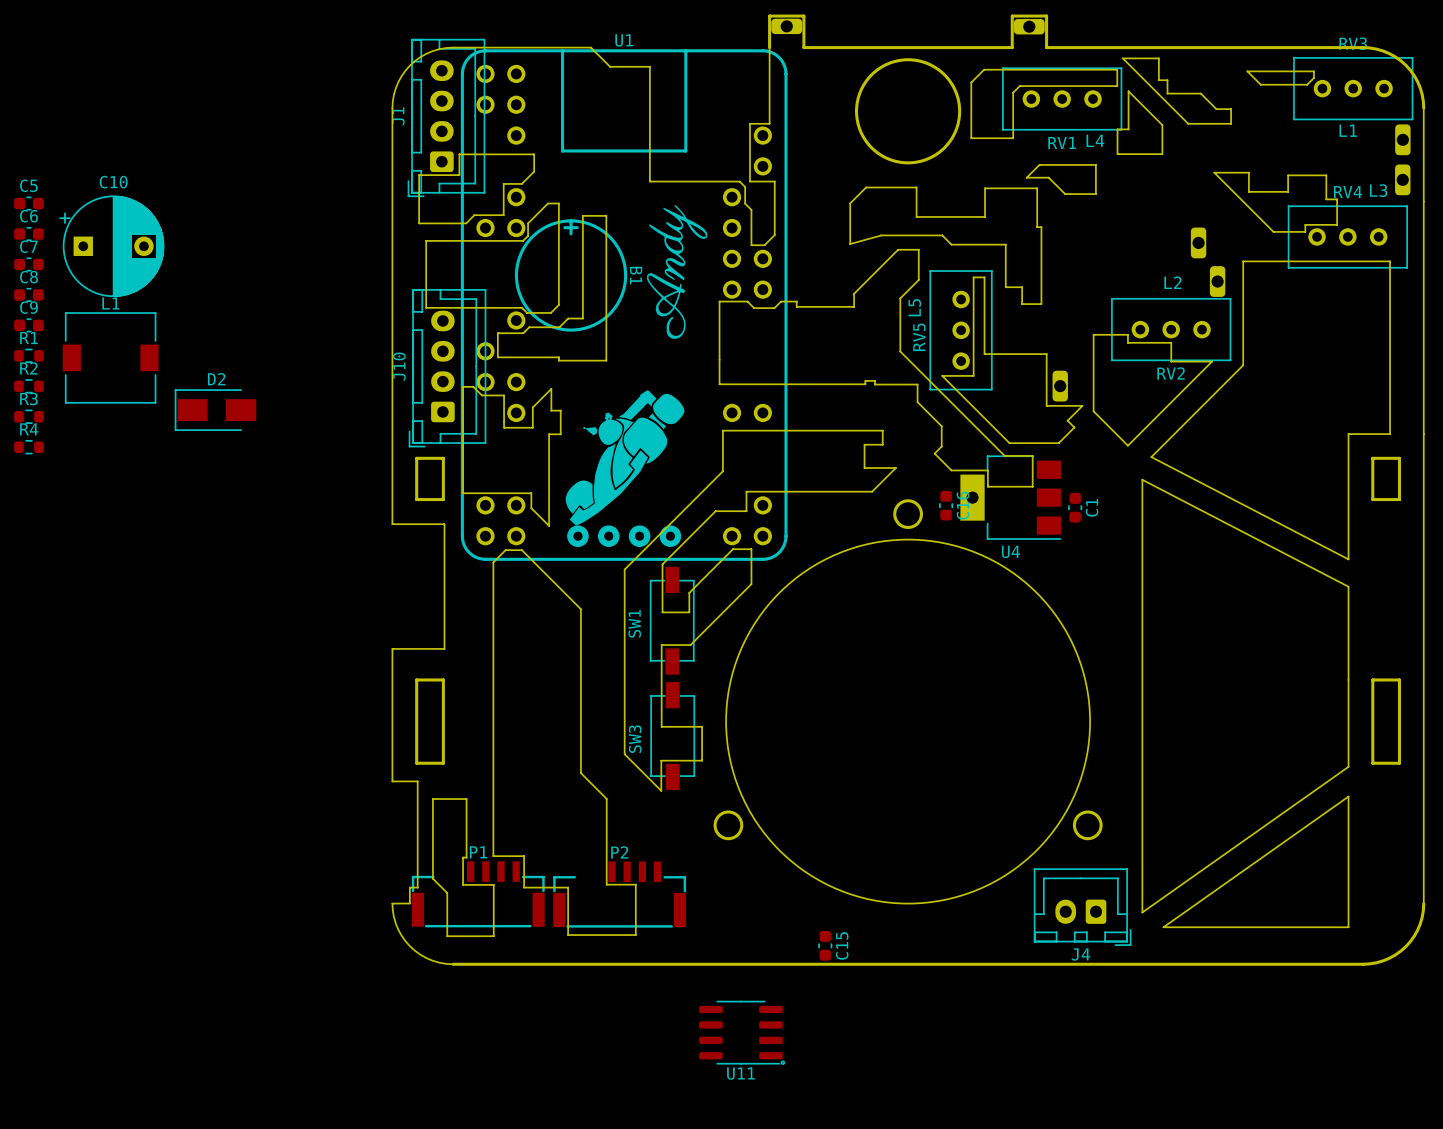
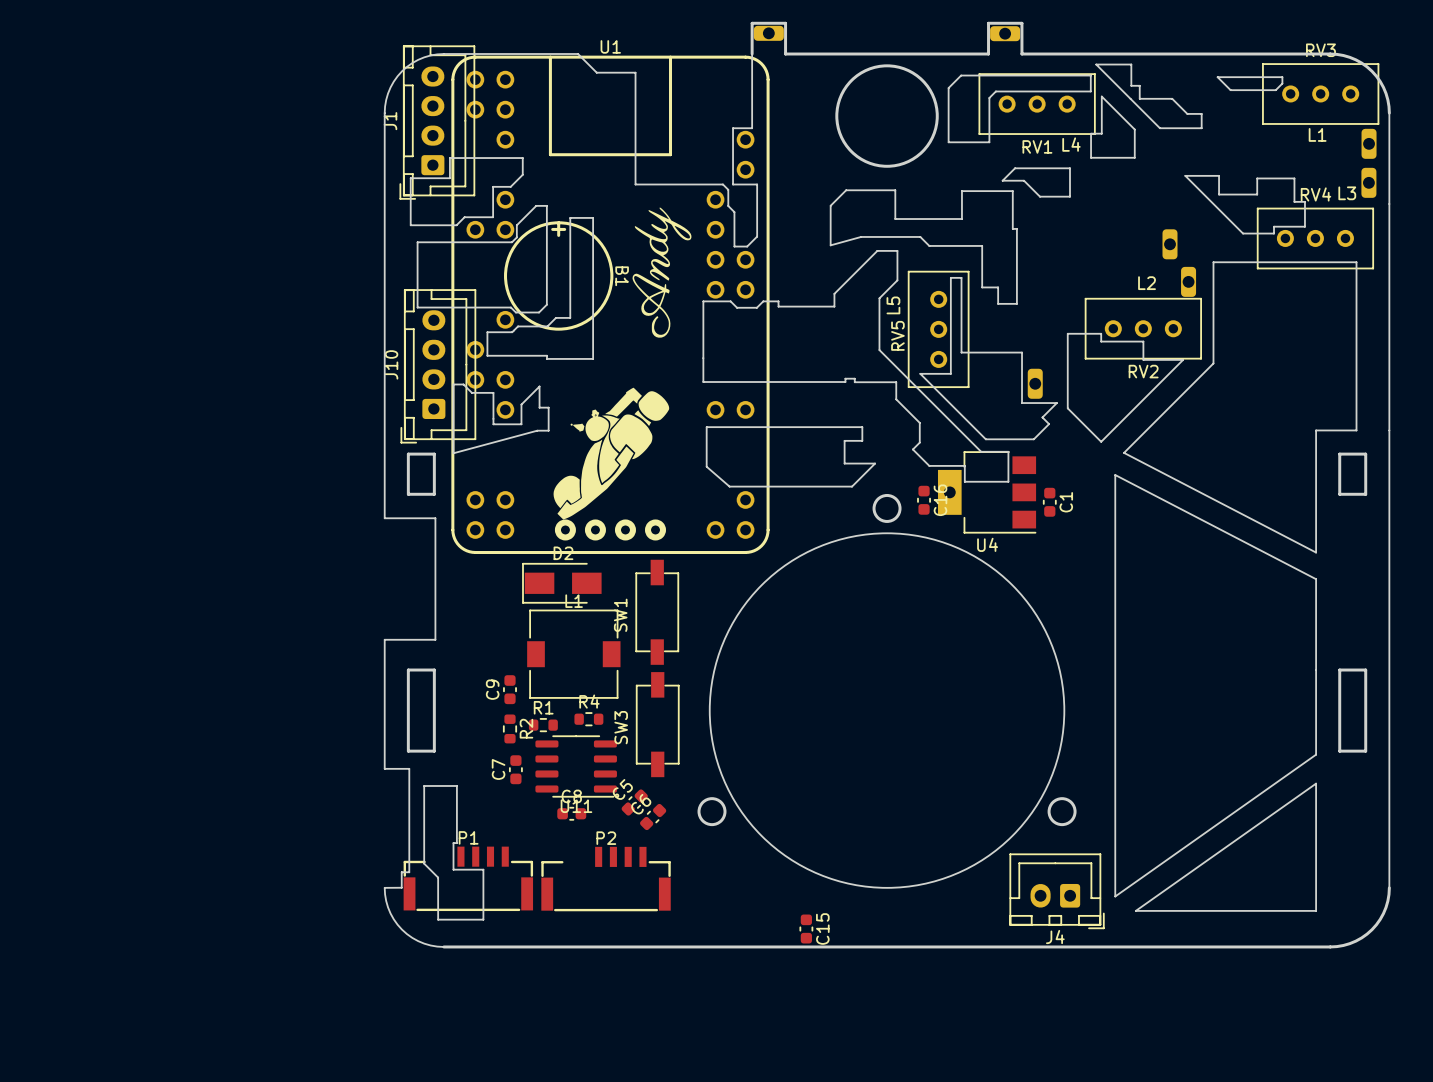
C5 rotation: 0° (28, 203) -> 45° counterclockwise (634, 802)
C5 position: (28, 203) -> (634, 802)
C6 rotation: 0° (28, 234) -> 45° counterclockwise (653, 817)
C6 position: (28, 234) -> (653, 817)
C7 name position: C7 (28, 246) -> C7 (498, 769)
C10: (111, 246) -> none
C7 rotation: 0° (28, 264) -> 90° clockwise (515, 769)
C7 position: (28, 264) -> (515, 769)
C8 position: (28, 294) -> (571, 813)
C9 name position: C9 (28, 307) -> C9 (492, 689)
C9 rotation: 0° (28, 325) -> 90° clockwise (510, 689)
C9 position: (28, 325) -> (510, 689)
R1 position: (28, 355) -> (543, 725)
L1 position: (110, 357) -> (573, 654)
R2 rotation: 0° (28, 386) -> 90° clockwise (510, 728)
R2 position: (28, 386) -> (510, 728)
D2 position: (215, 410) -> (561, 583)
R3: (28, 416) -> none
board edge: (549, 434) (549, 525) (531, 508) (531, 493) (463, 493) (463, 457) -> (537, 430) (453, 453)
R4 position: (28, 447) -> (588, 719)
board edge: (722, 471) (624, 569) (624, 754) (661, 790) (661, 760) (702, 760) (702, 726) (661, 726) (661, 645) (690, 645) (751, 584) (751, 549) (733, 549) (689, 592) (689, 612) (662, 612) (662, 564) (715, 511) (746, 511) (746, 491) -> (706, 466) (729, 486)
board edge: (505, 550) (521, 550) (580, 609) (580, 773) (606, 798) (606, 884) (635, 884) (635, 935) (568, 935) (568, 887) (524, 887) (524, 856) (493, 856) (493, 562) (505, 550) -> none
U11 position: (742, 1032) -> (577, 766)

